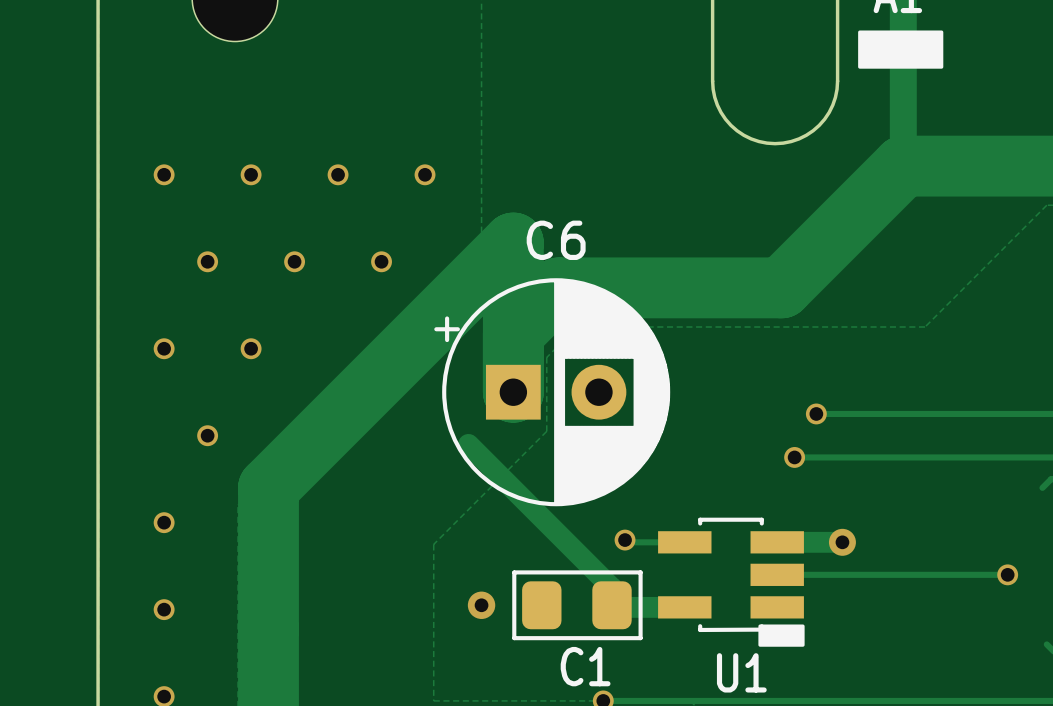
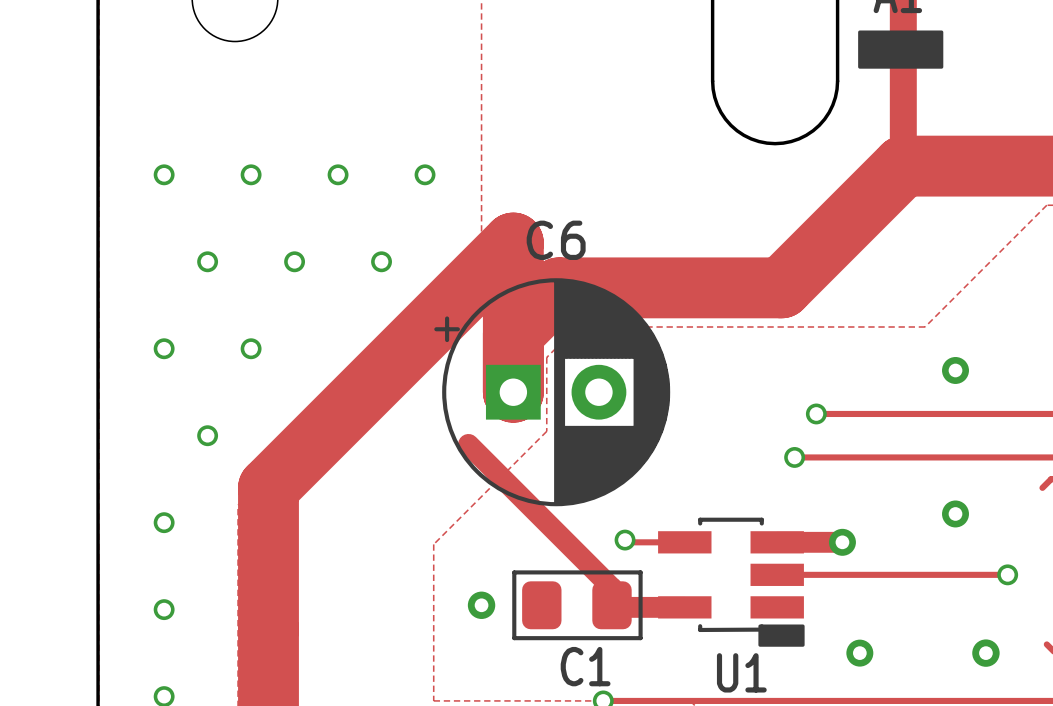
via: none -> (955, 370)
via: none -> (955, 513)
via: none -> (859, 653)
via: none -> (985, 653)

